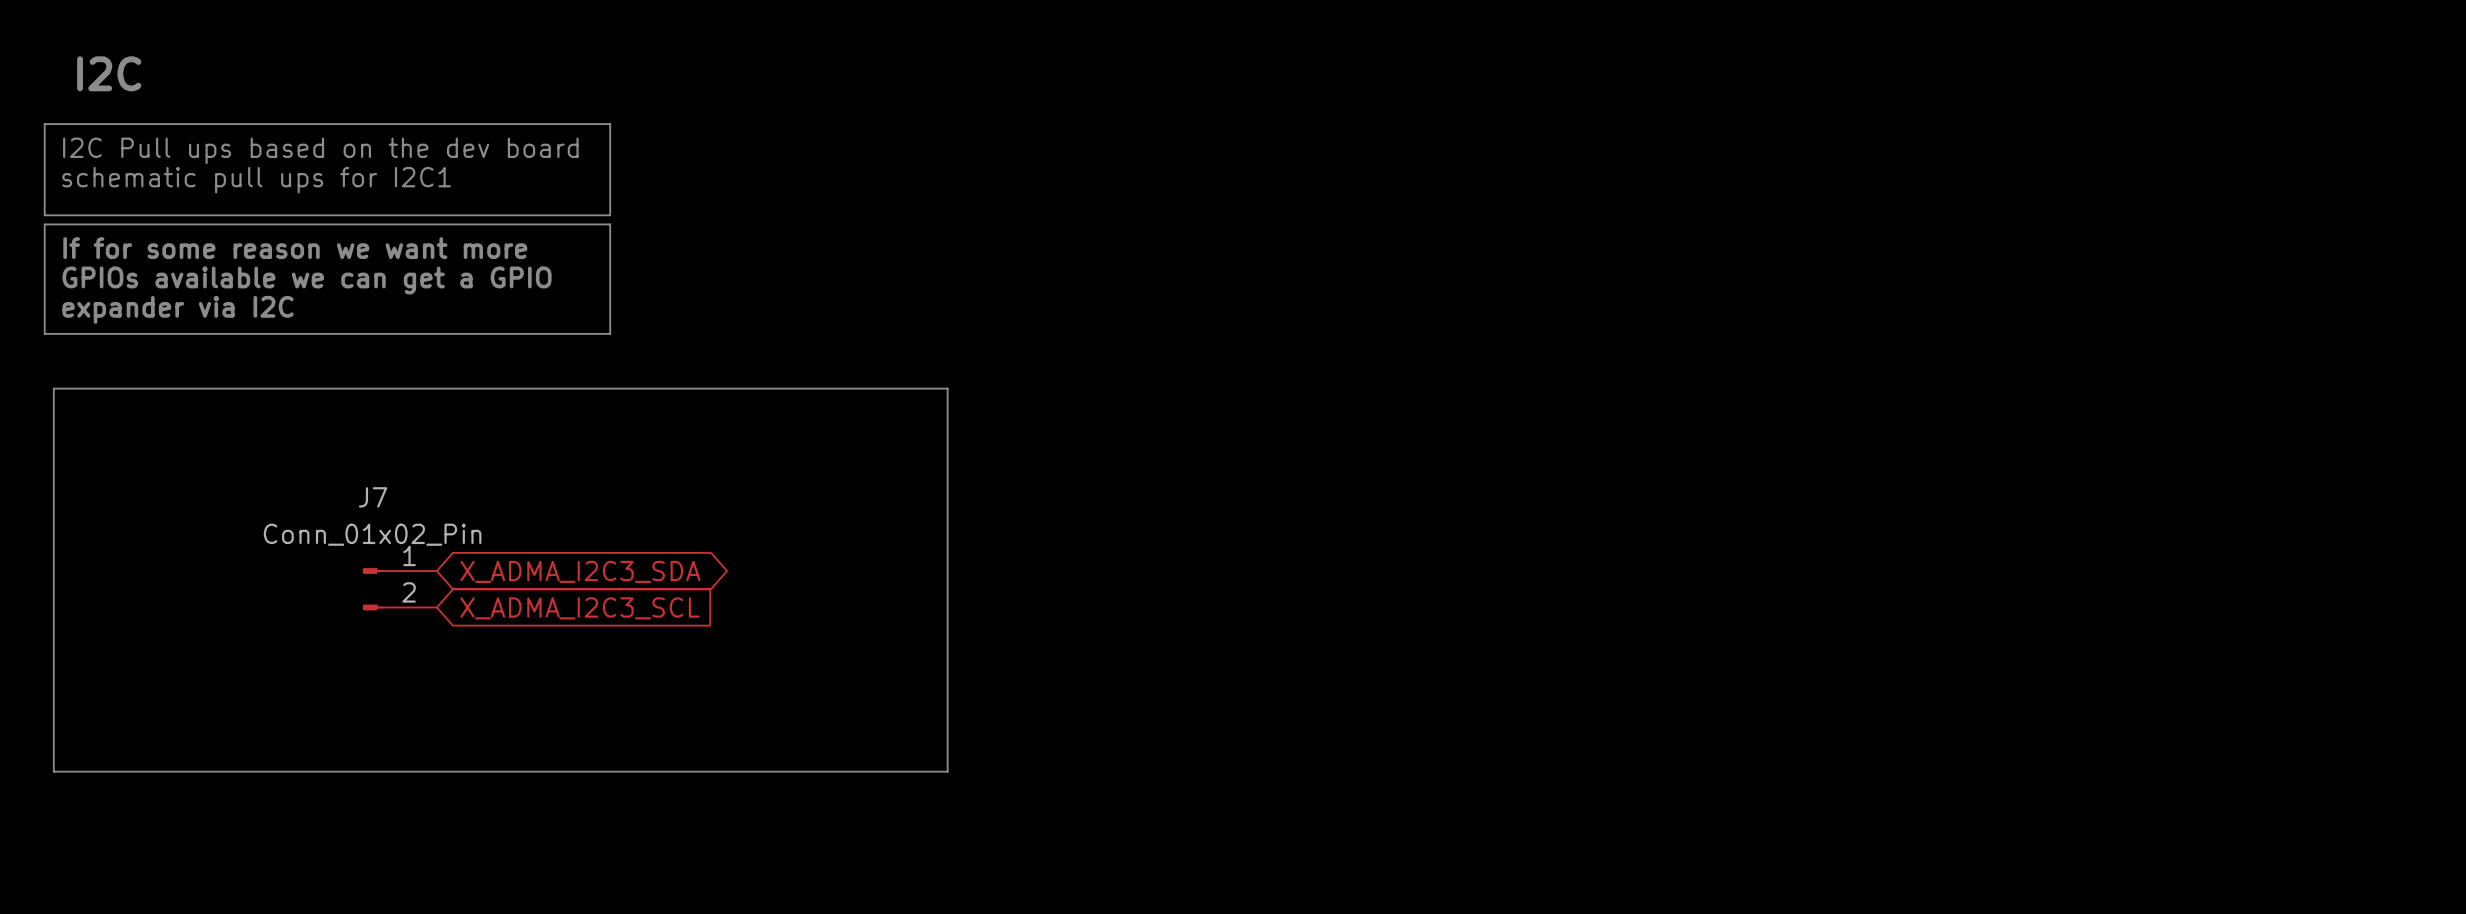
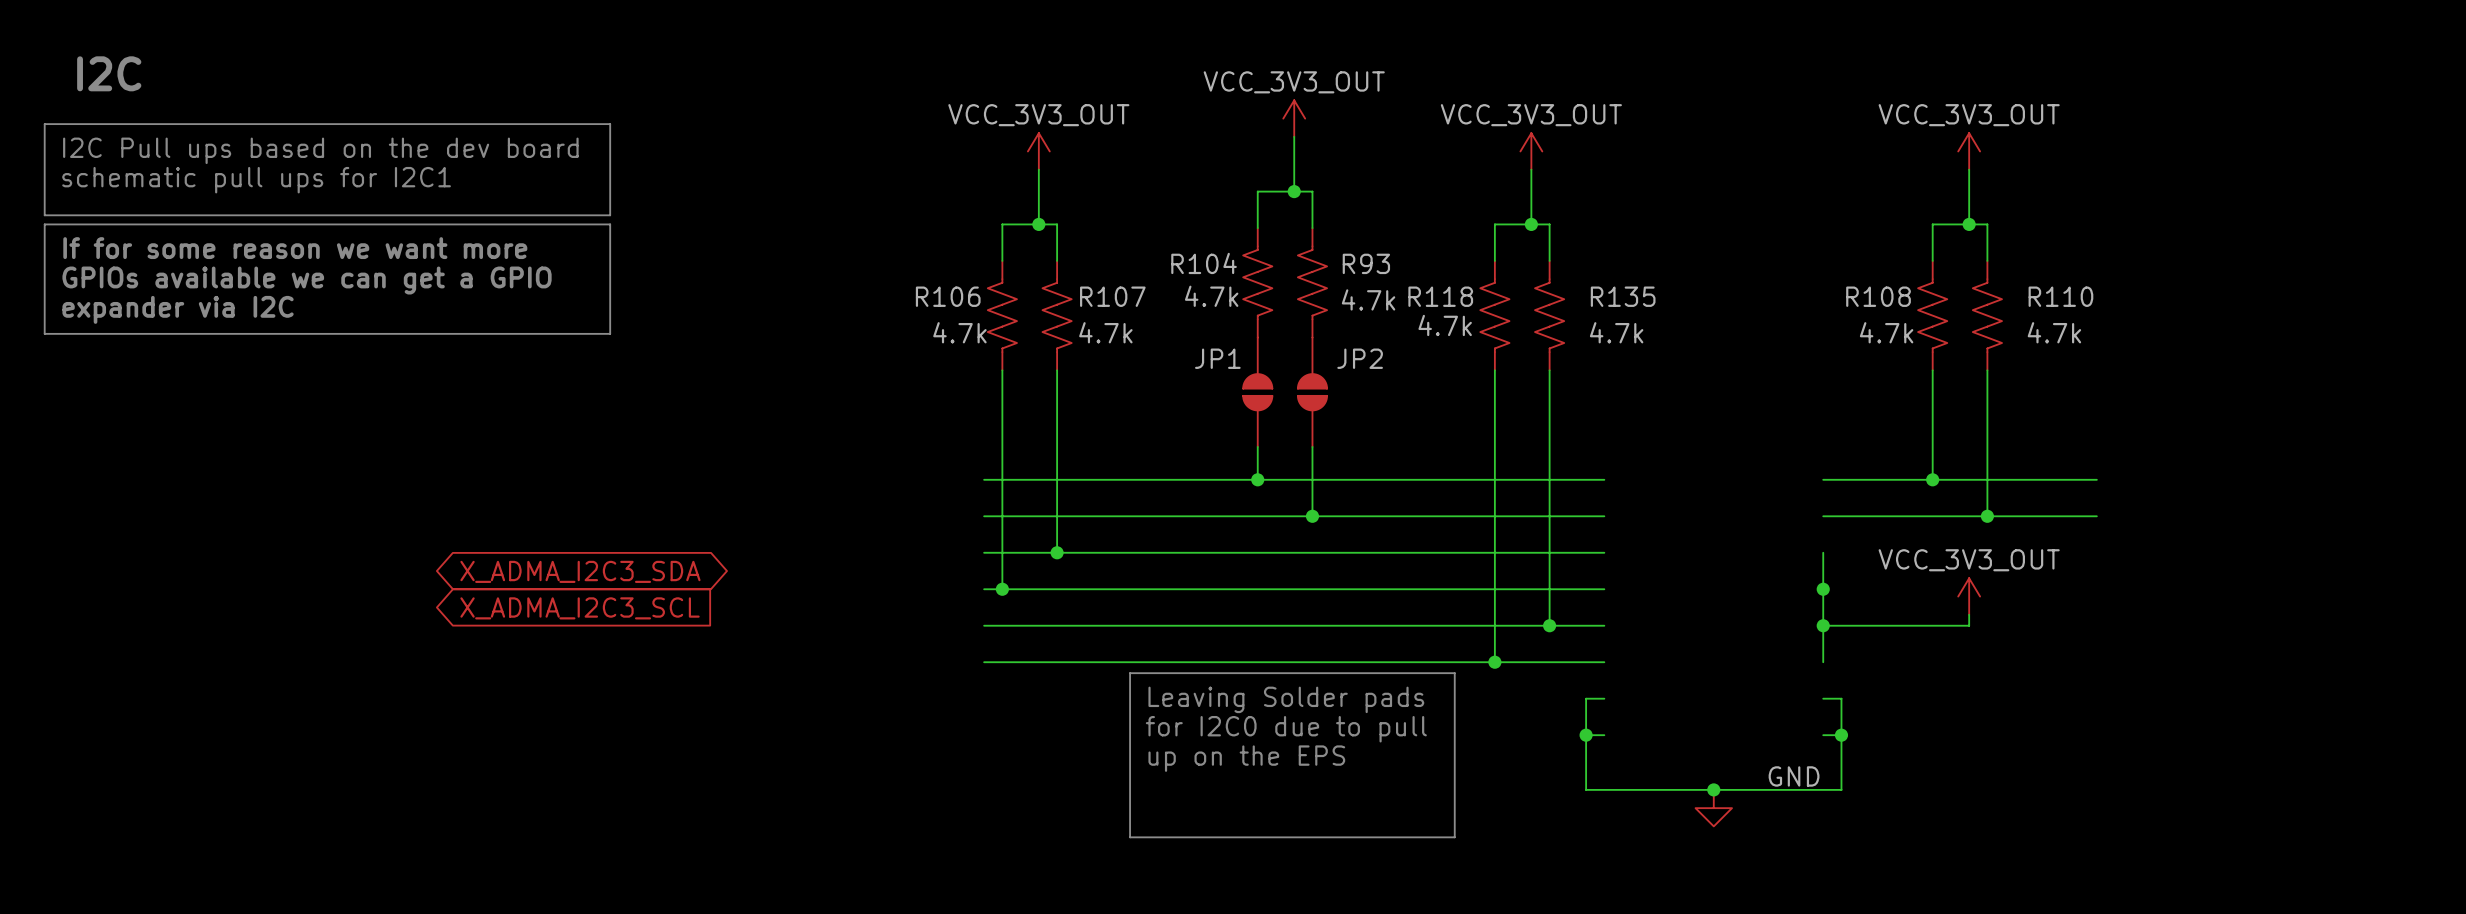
power symbol: none -> VCC_3V3_OUT (1294, 118)
wire: none -> (1294, 136) (1294, 191)
power symbol: none -> VCC_3V3_OUT (1038, 151)
power symbol: none -> VCC_3V3_OUT (1531, 151)
power symbol: none -> VCC_3V3_OUT (1969, 151)
wire: none -> (1038, 169) (1038, 224)
wire: none -> (1531, 169) (1531, 224)
wire: none -> (1969, 169) (1969, 224)
junction: none -> (1294, 191)
junction: none -> (1038, 224)
junction: none -> (1531, 224)
junction: none -> (1969, 224)
wire: none -> (1257, 228) (1257, 191) (1312, 191) (1312, 228)
wire: none -> (1002, 260) (1002, 224) (1057, 224) (1057, 260)
wire: none -> (1494, 260) (1494, 224) (1549, 224) (1549, 260)
wire: none -> (1932, 260) (1932, 224) (1987, 224) (1987, 260)
R104: none -> 4.7k (1257, 282)
R93: none -> 4.7k (1312, 282)
R106: none -> 4.7k (1002, 315)
R107: none -> 4.7k (1057, 315)
R118: none -> 4.7k (1494, 315)
R135: none -> 4.7k (1549, 315)
R108: none -> 4.7k (1932, 315)
R110: none -> 4.7k (1987, 315)
wire: none -> (1002, 370) (1002, 589)
wire: none -> (1057, 370) (1057, 552)
wire: none -> (1494, 370) (1494, 662)
wire: none -> (1549, 370) (1549, 625)
wire: none -> (1932, 370) (1932, 479)
wire: none -> (1987, 370) (1987, 516)
line: (53, 388) (947, 388) (947, 771) (53, 771) (53, 388) -> none
JP1: none -> (1257, 392)
JP2: none -> (1312, 392)
wire: none -> (1257, 446) (1257, 479)
wire: none -> (1312, 446) (1312, 516)
wire: none -> (984, 479) (1604, 479)
junction: none -> (1257, 479)
wire: none -> (1823, 479) (2096, 479)
junction: none -> (1932, 479)
wire: none -> (984, 516) (1604, 516)
junction: none -> (1312, 516)
wire: none -> (1823, 516) (2096, 516)
junction: none -> (1987, 516)
wire: none -> (984, 552) (1604, 552)
junction: none -> (1057, 552)
wire: none -> (1823, 552) (1823, 662)
J7: Conn_01x02_Pin (399, 589) -> none
wire: none -> (984, 589) (1604, 589)
junction: none -> (1002, 589)
junction: none -> (1823, 589)
power symbol: none -> VCC_3V3_OUT (1969, 596)
wire: none -> (1969, 614) (1969, 625) (1823, 625)
wire: none -> (984, 625) (1604, 625)
junction: none -> (1549, 625)
junction: none -> (1823, 625)
wire: none -> (984, 662) (1604, 662)
junction: none -> (1494, 662)
line: none -> (1130, 673) (1454, 673) (1454, 837) (1130, 837) (1130, 673)
wire: none -> (1604, 698) (1586, 698) (1586, 789) (1841, 789) (1841, 698) (1823, 698)
text: none -> Leaving Solder pads (1286, 699)
text: none -> for I2C0 due to pull (1286, 729)
wire: none -> (1586, 735) (1604, 735)
junction: none -> (1586, 735)
wire: none -> (1823, 735) (1841, 735)
junction: none -> (1841, 735)
text: none -> up on the EPS (1246, 758)
junction: none -> (1713, 789)
power symbol: none -> GND (1713, 808)

